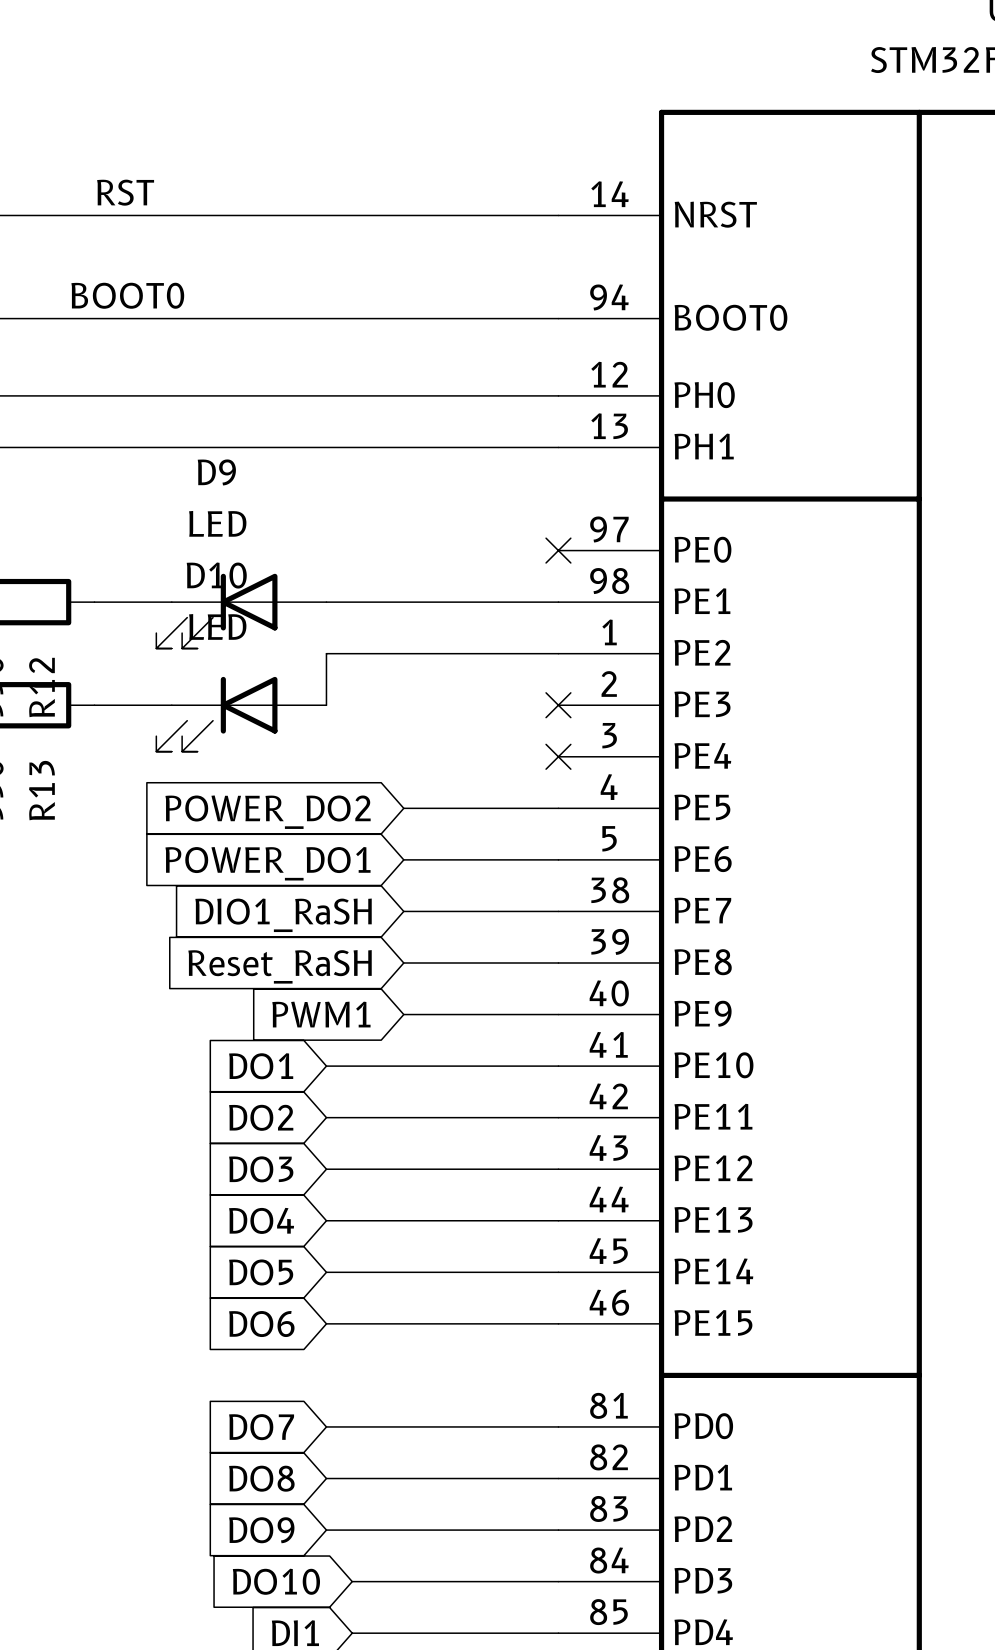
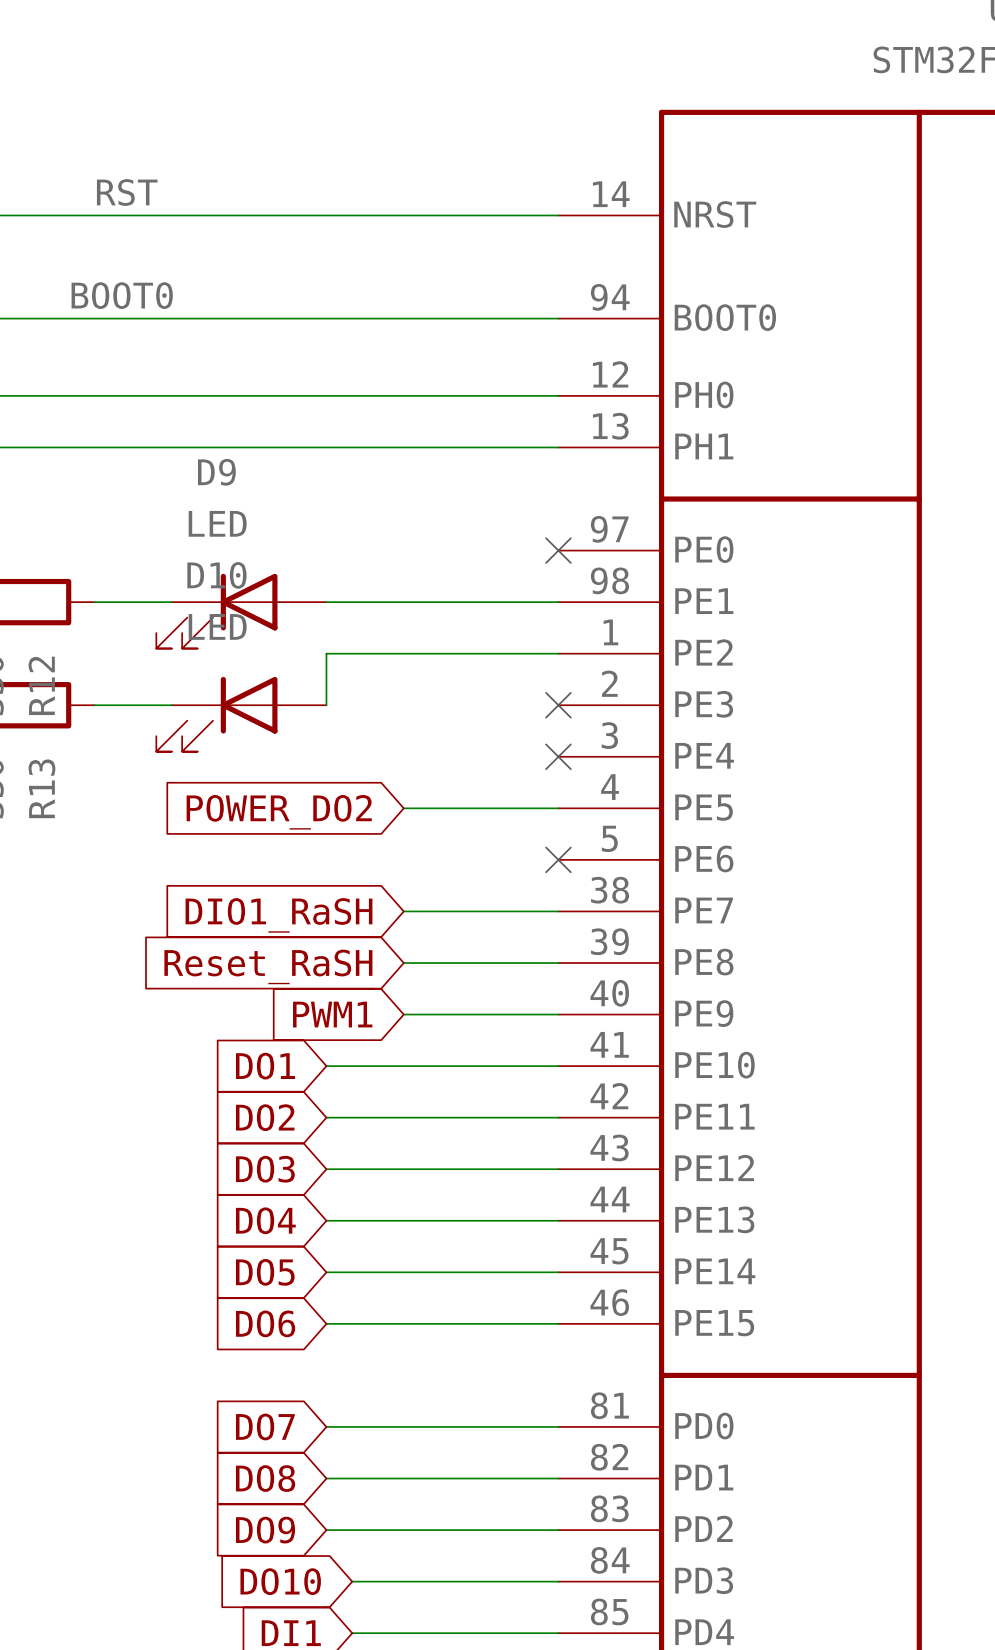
wire: (403, 859) (558, 859) -> none
no-connect mark: none -> (558, 859)
global label: POWER_DO1 (267, 863) -> none

